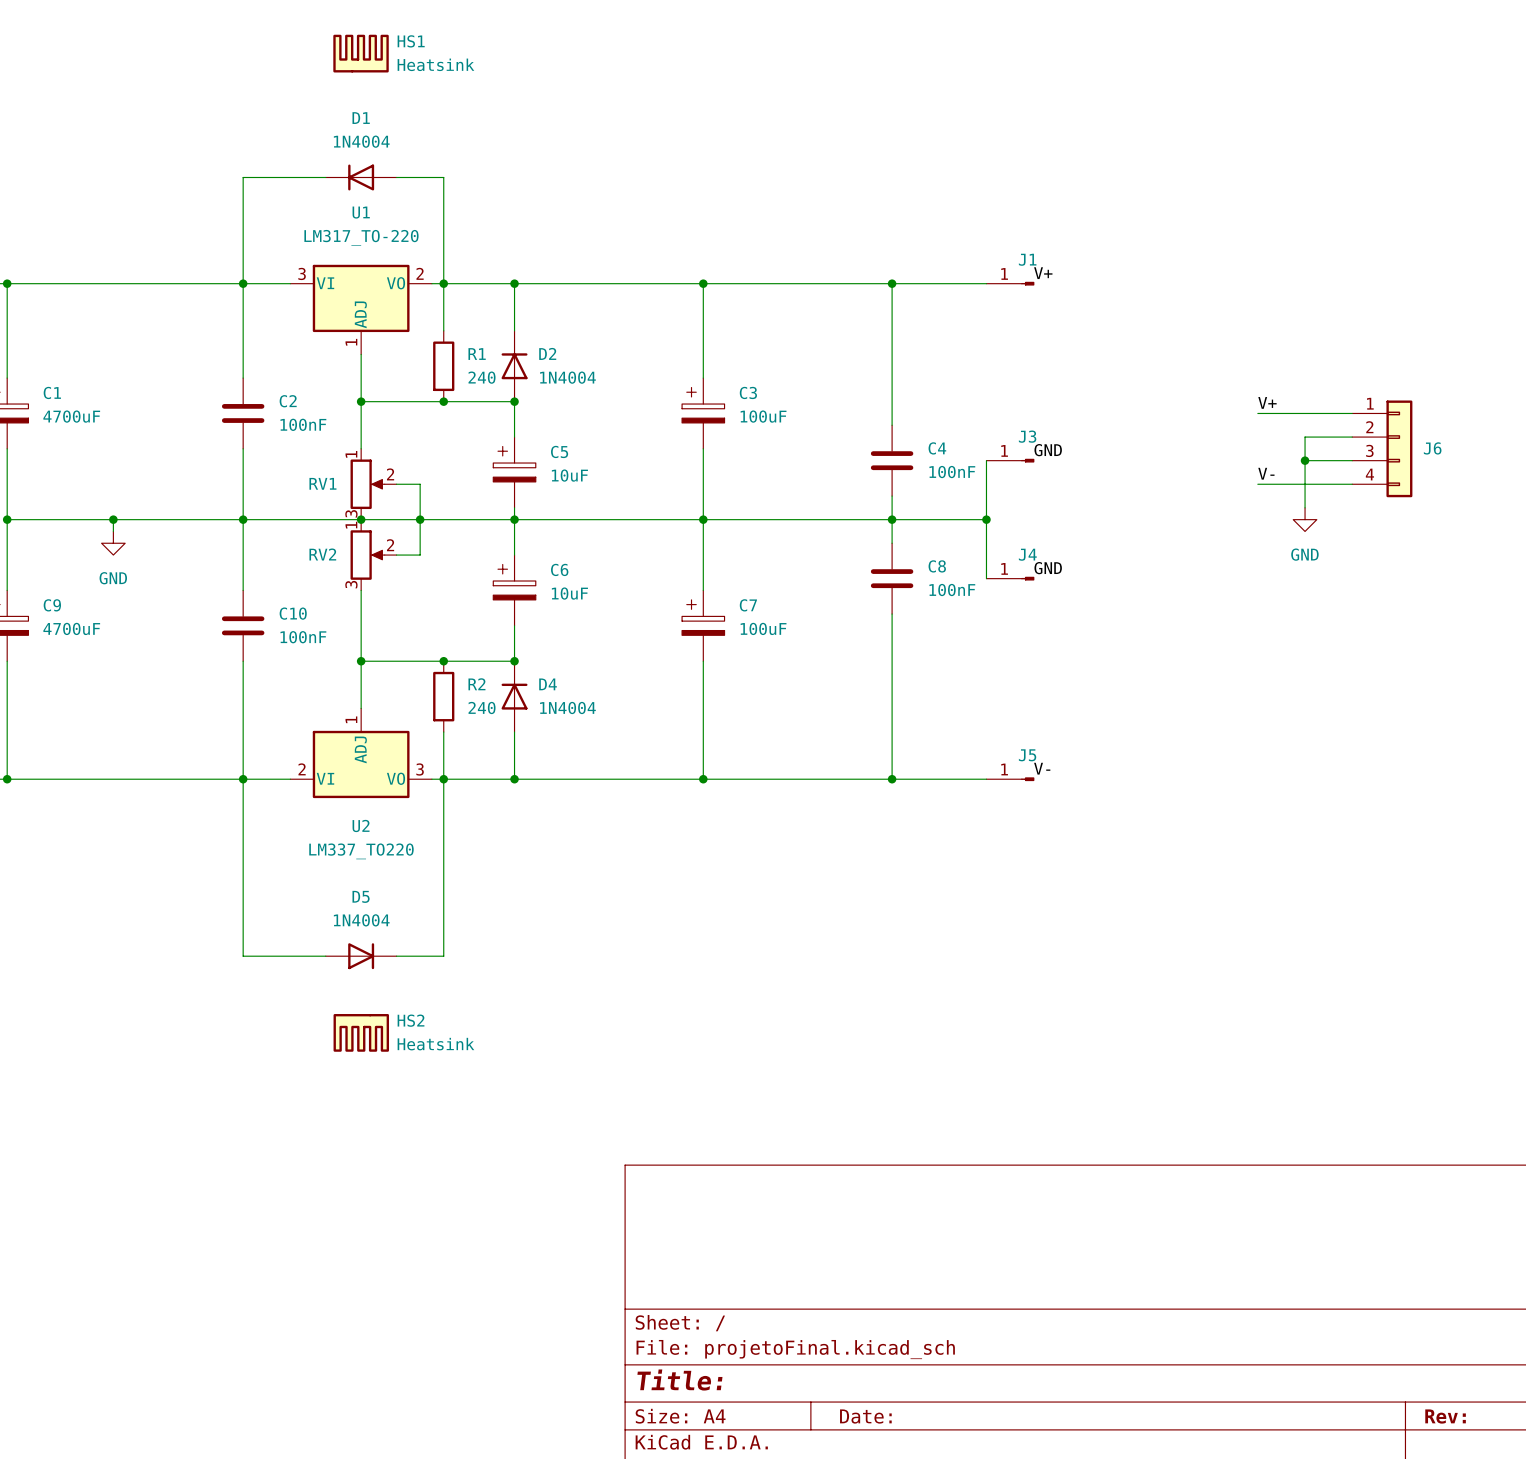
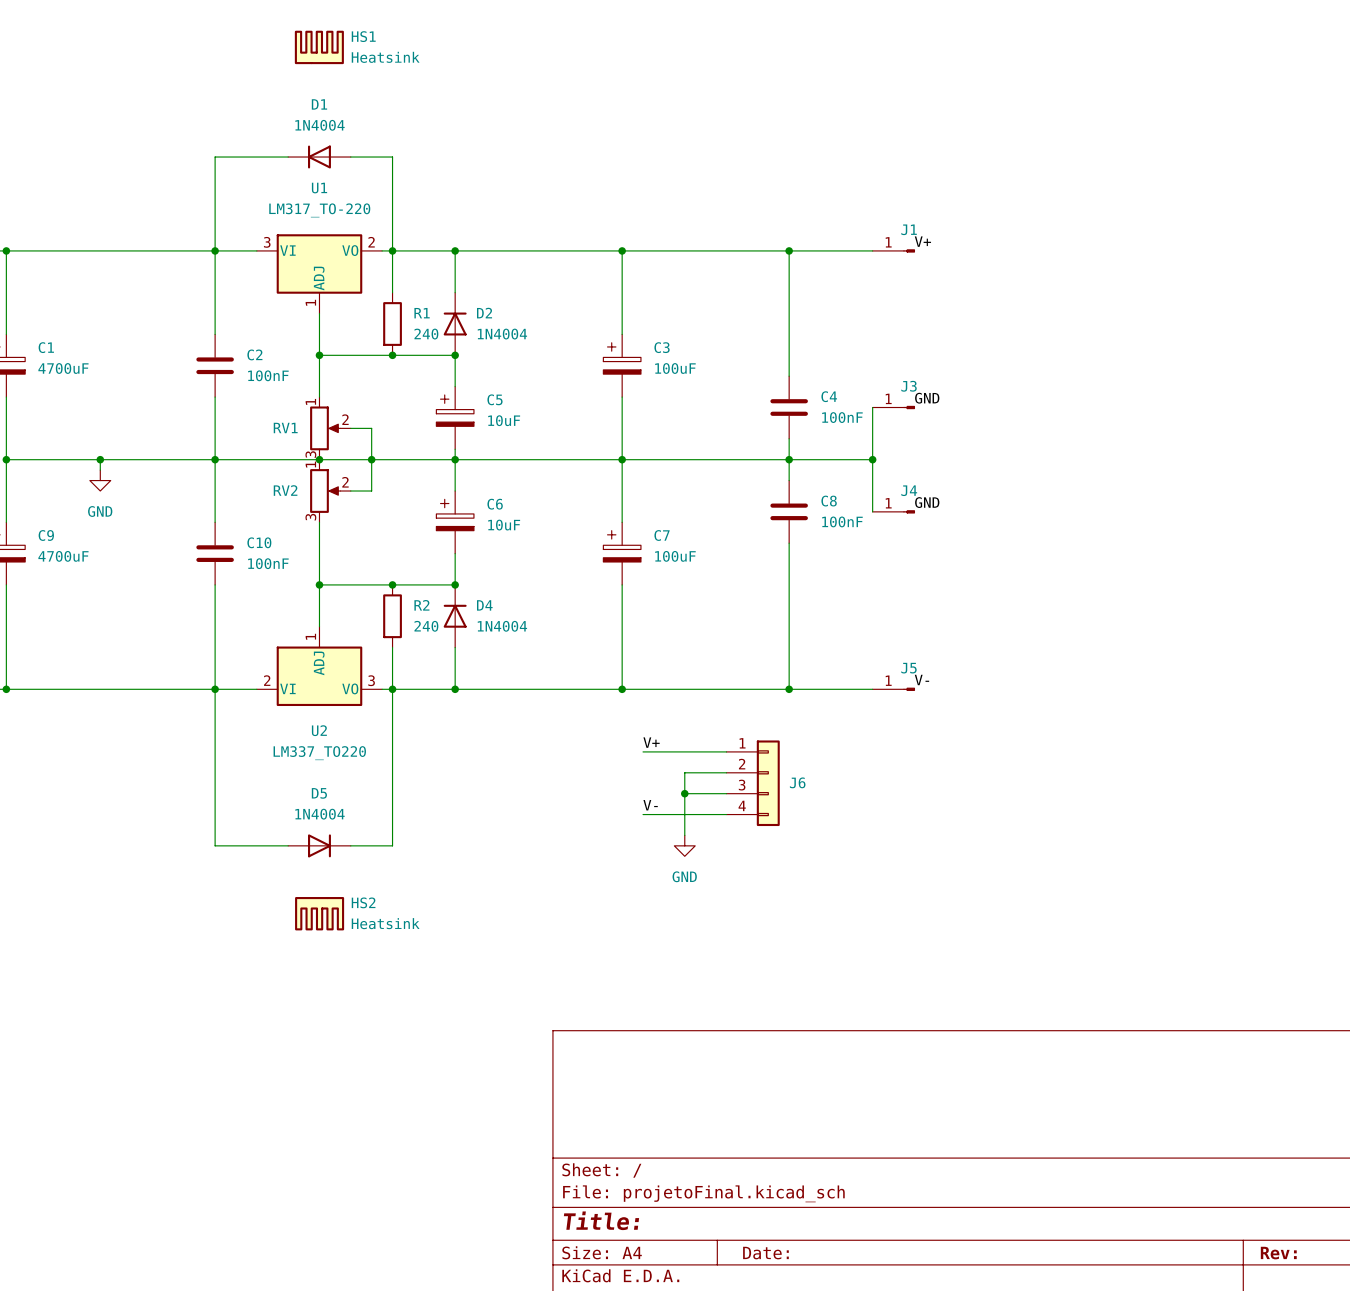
label: V+ (1267, 402) -> none
wire: (1257, 413) (1352, 413) -> none
wire: (1352, 437) (1305, 437) (1305, 507) -> none
J6 position: (1382, 448) -> (753, 783)
wire: (1305, 460) (1352, 460) -> none
junction: (1305, 460) -> none
label: V- (1266, 473) -> none
wire: (1257, 484) (1352, 484) -> none
power symbol: GND (1305, 519) -> none
label: none -> V+ (651, 742)
wire: none -> (643, 751) (726, 751)
wire: none -> (726, 772) (684, 772) (684, 835)
wire: none -> (684, 793) (726, 793)
junction: none -> (684, 793)
label: none -> V- (650, 805)
wire: none -> (643, 814) (726, 814)
power symbol: none -> GND (684, 845)

